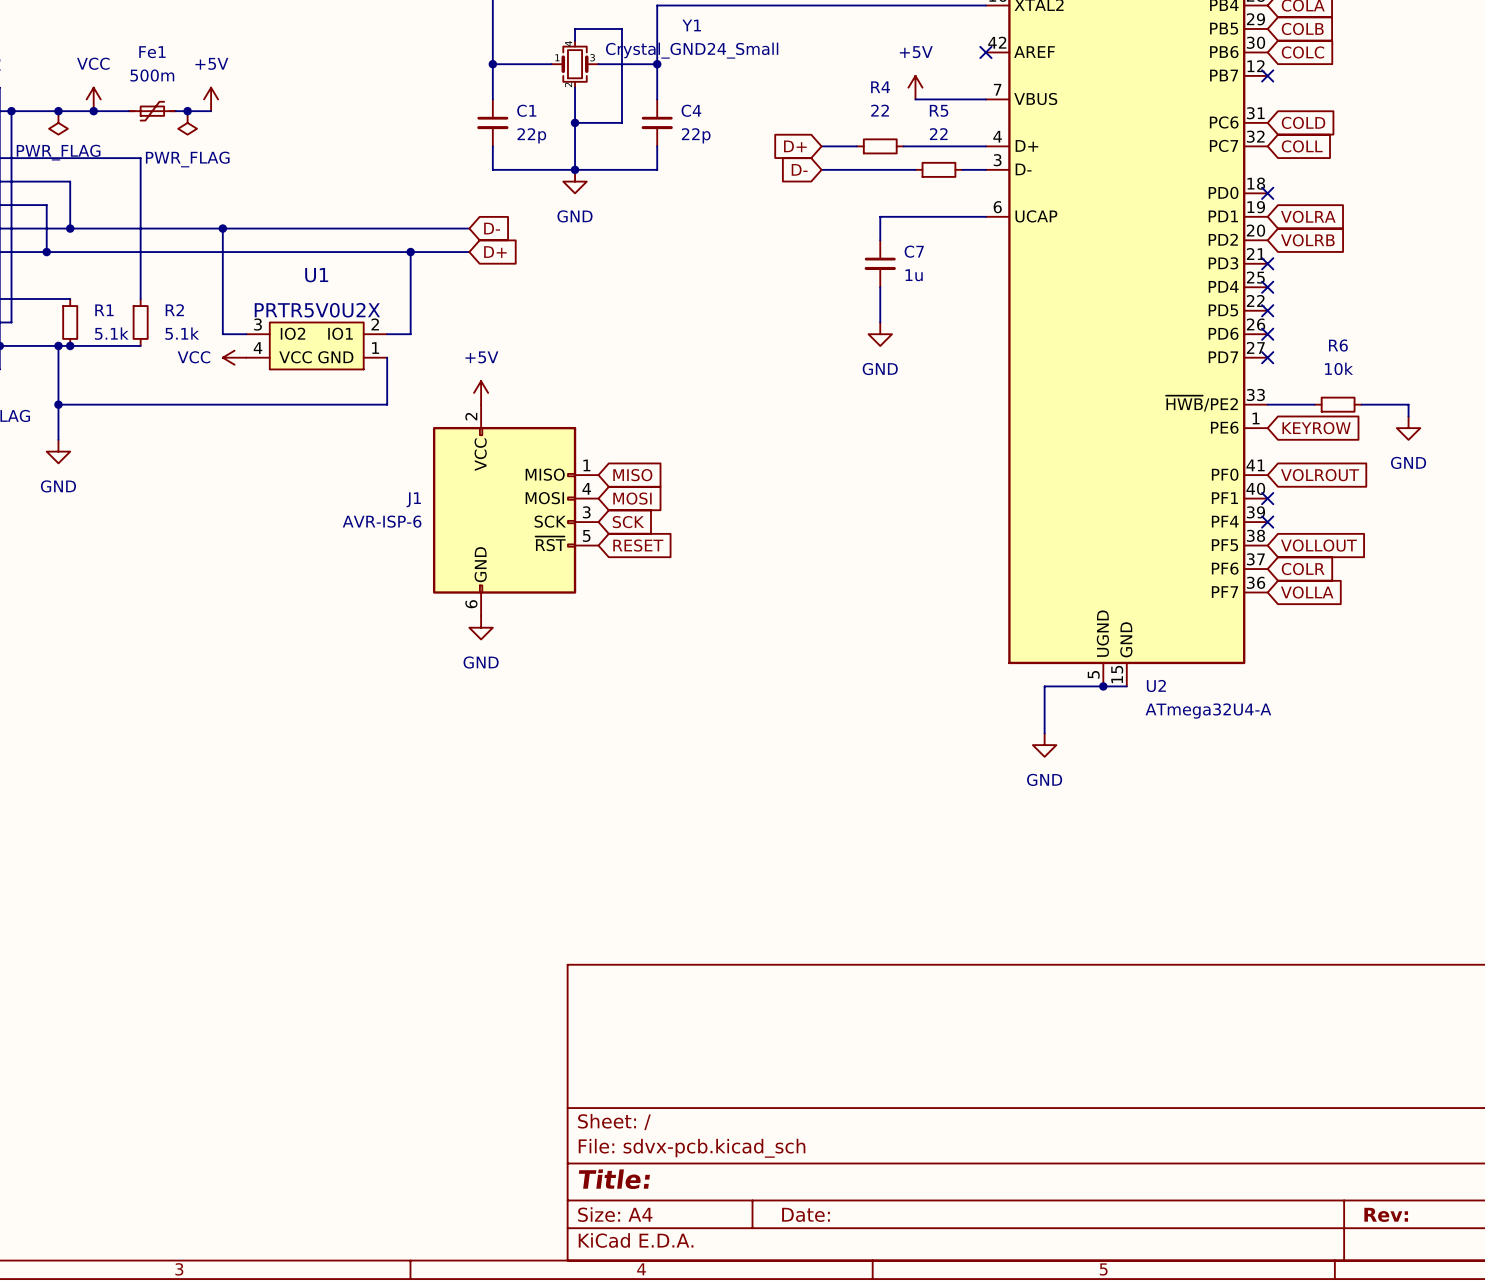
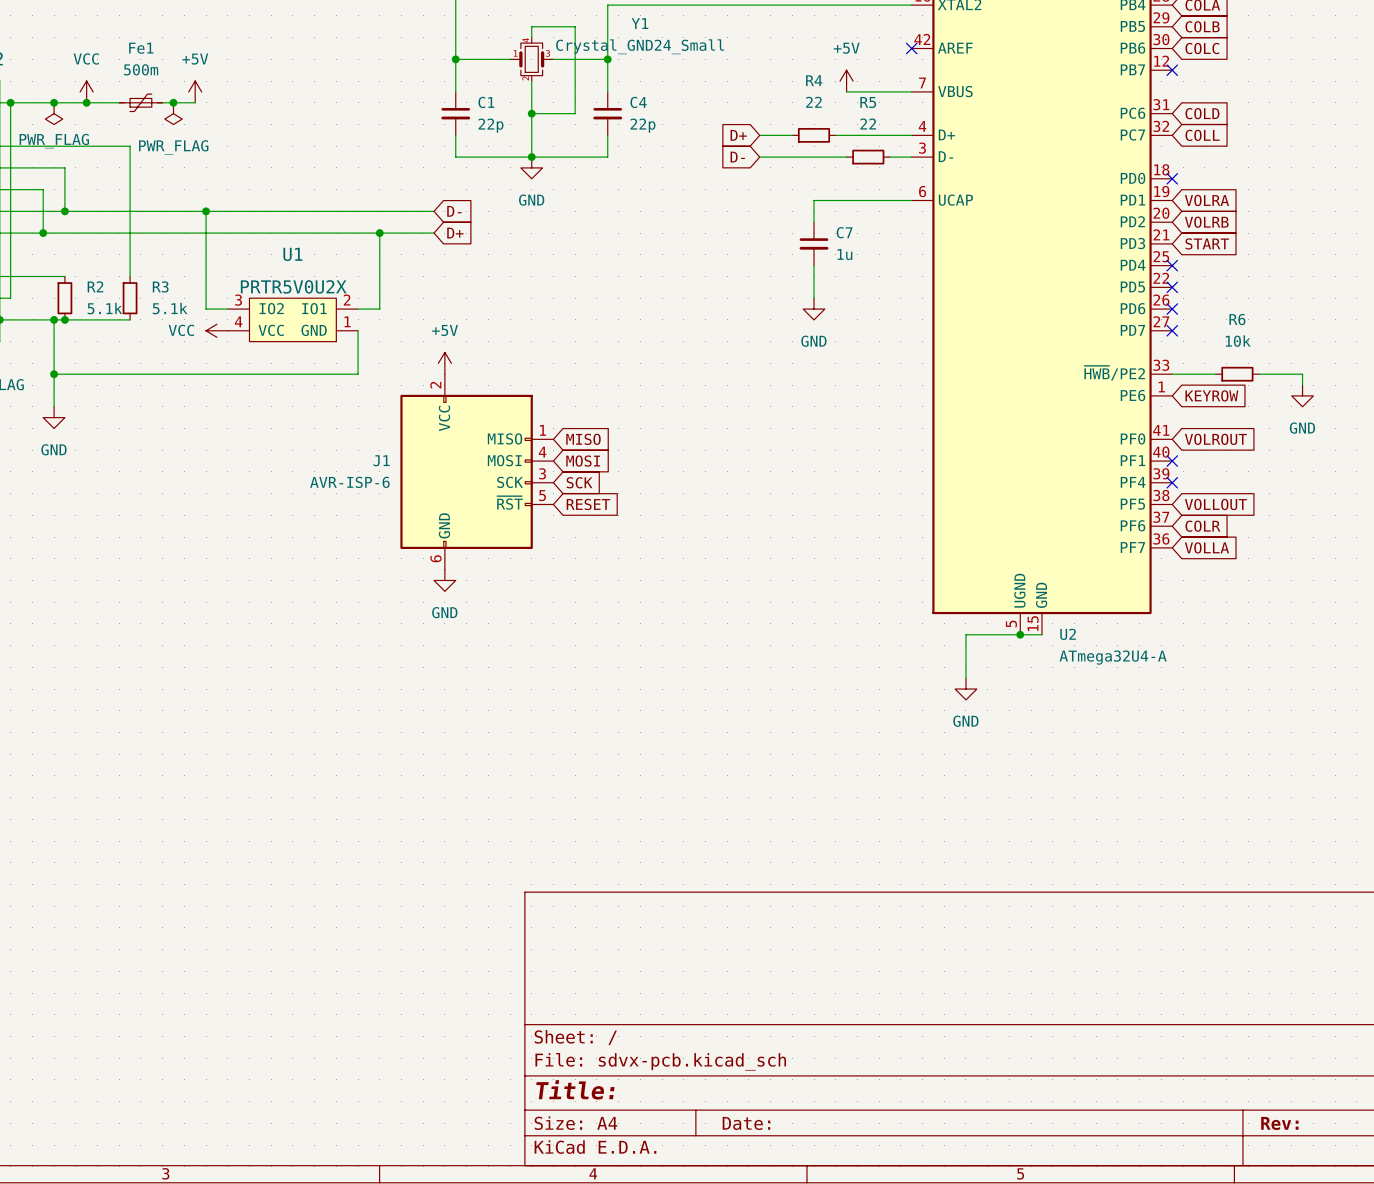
no-connect mark: (1267, 263) -> none
global label: none -> START (1207, 243)
R1 name: R1 (104, 310) -> R2 (95, 286)
R2 name: R2 (174, 310) -> R3 (160, 286)

